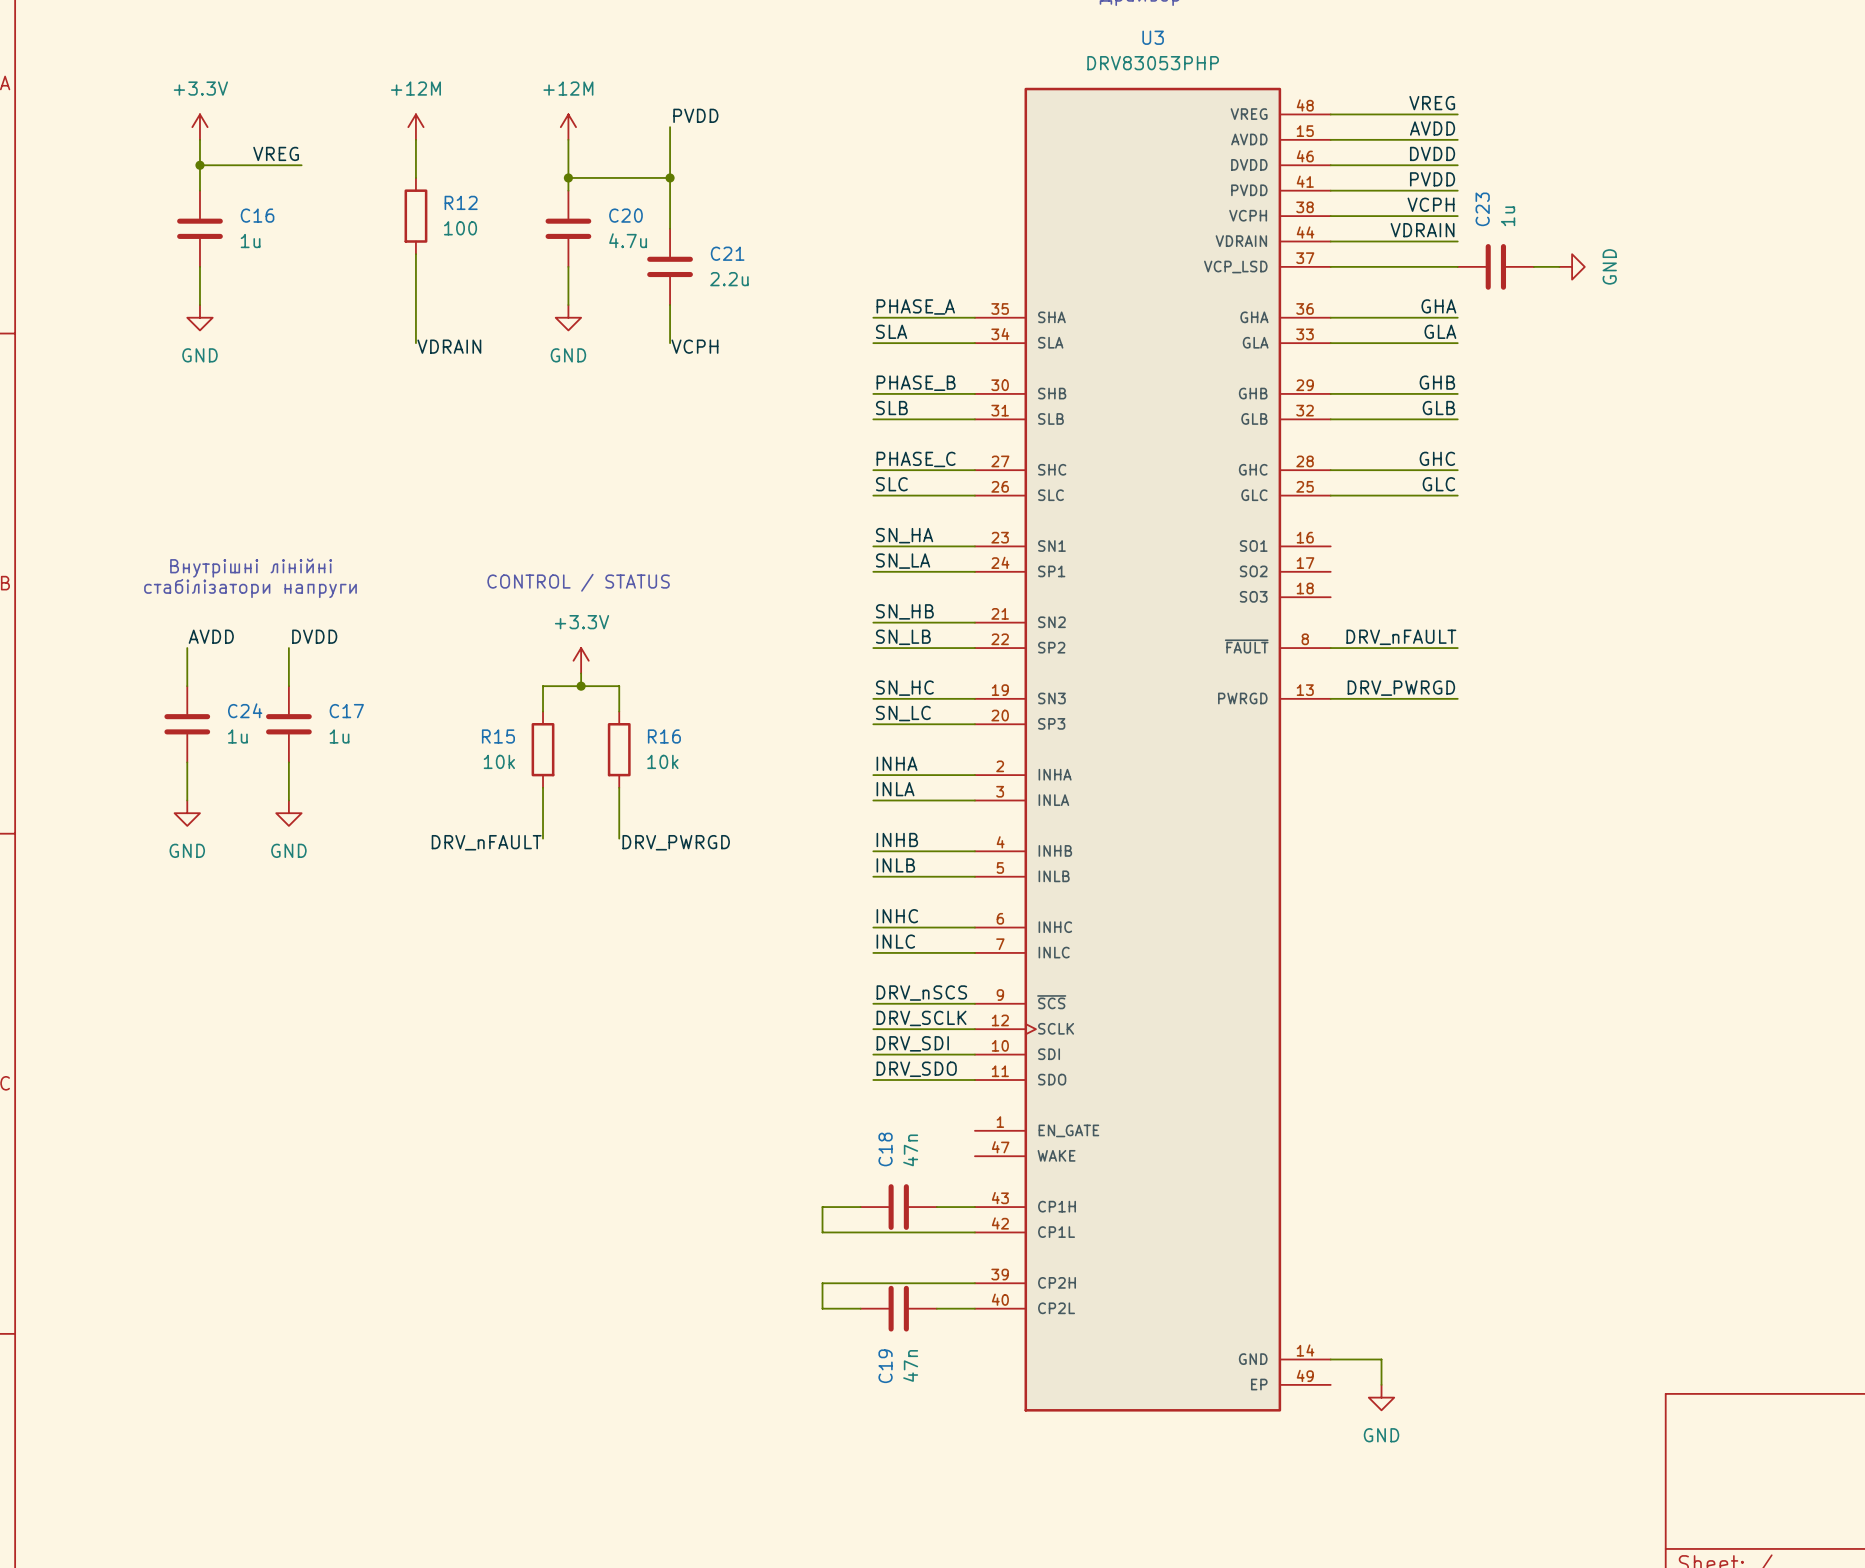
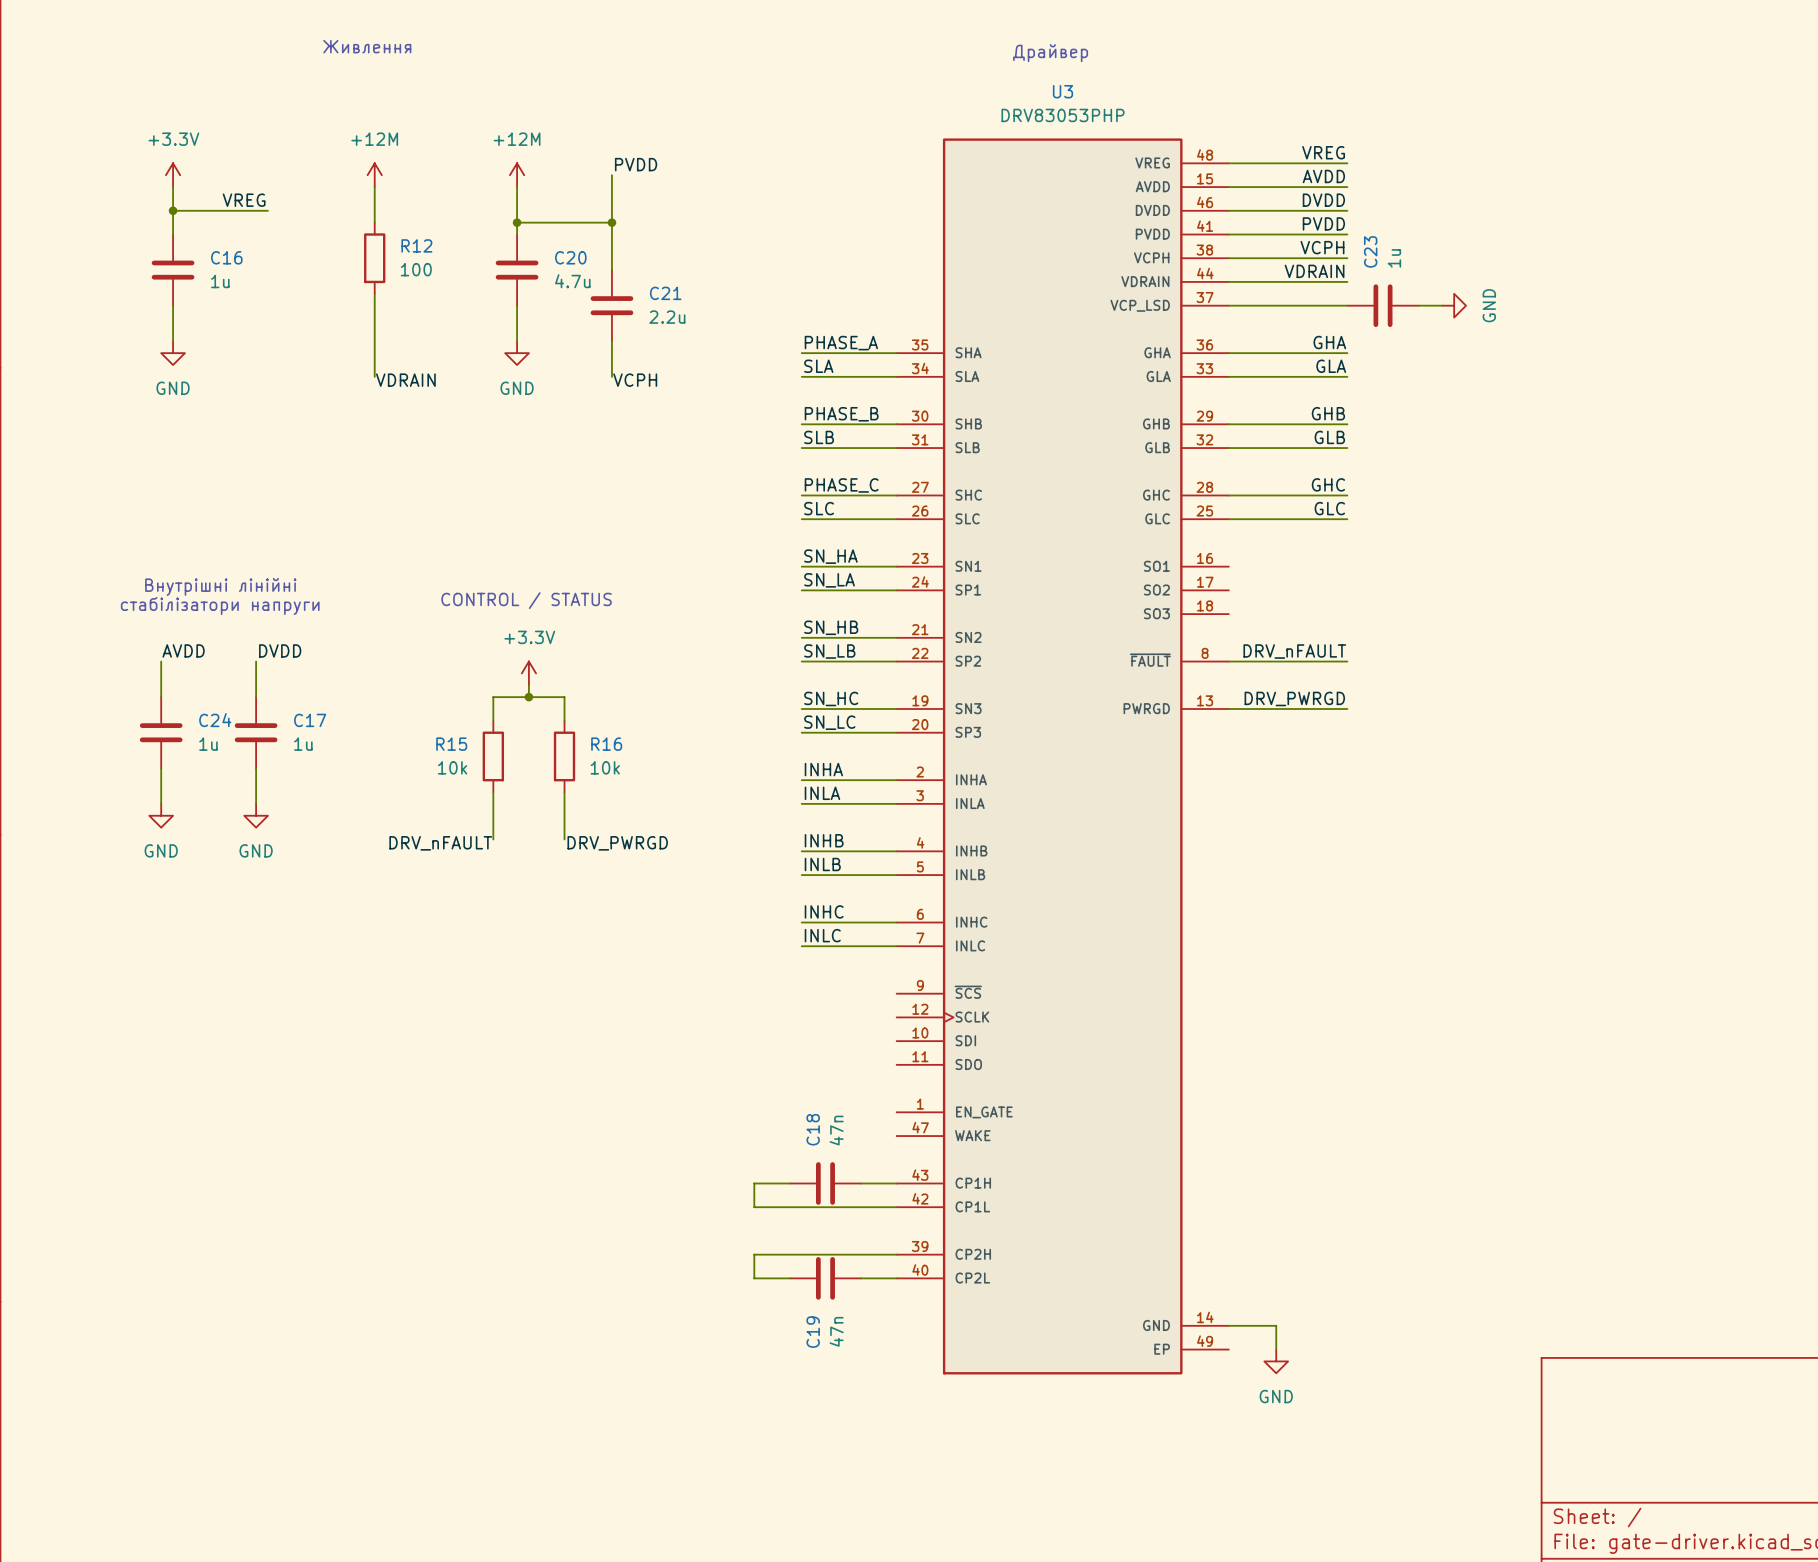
label: DRV_nSCS (921, 993) -> none
wire: (873, 1003) (974, 1003) -> none
label: DRV_SCLK (921, 1018) -> none
wire: (873, 1029) (974, 1029) -> none
label: DRV_SDI (912, 1043) -> none
wire: (873, 1054) (974, 1054) -> none
label: DRV_SDO (916, 1069) -> none
wire: (873, 1080) (974, 1080) -> none

